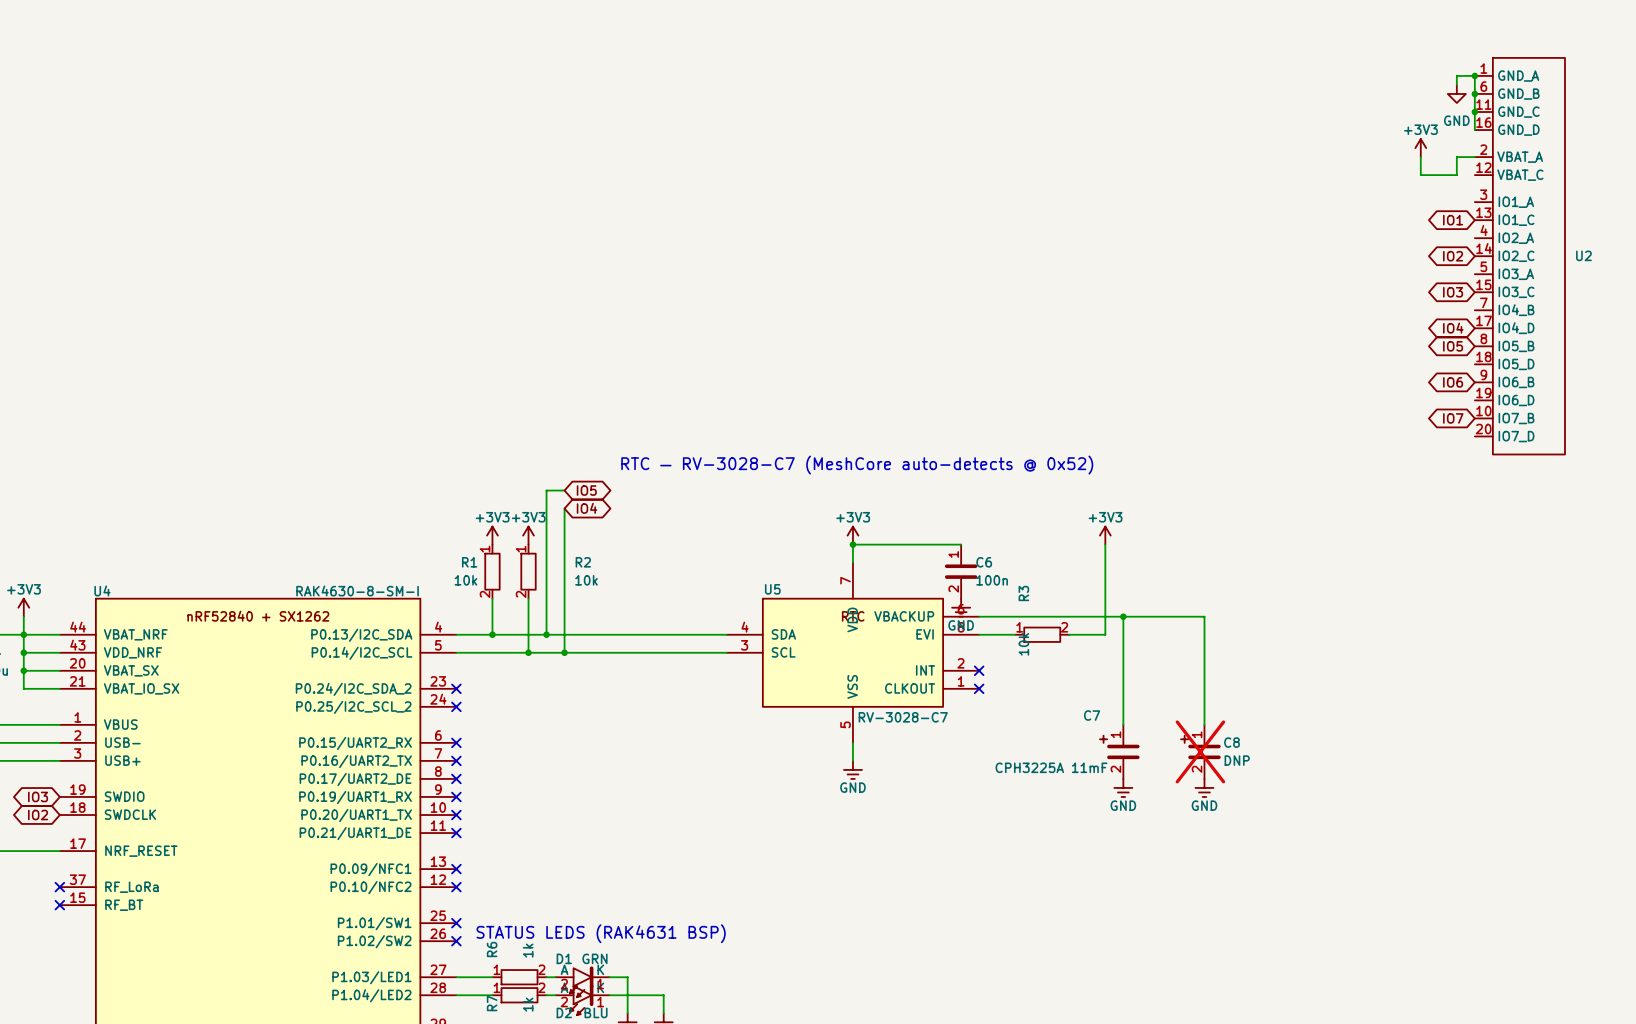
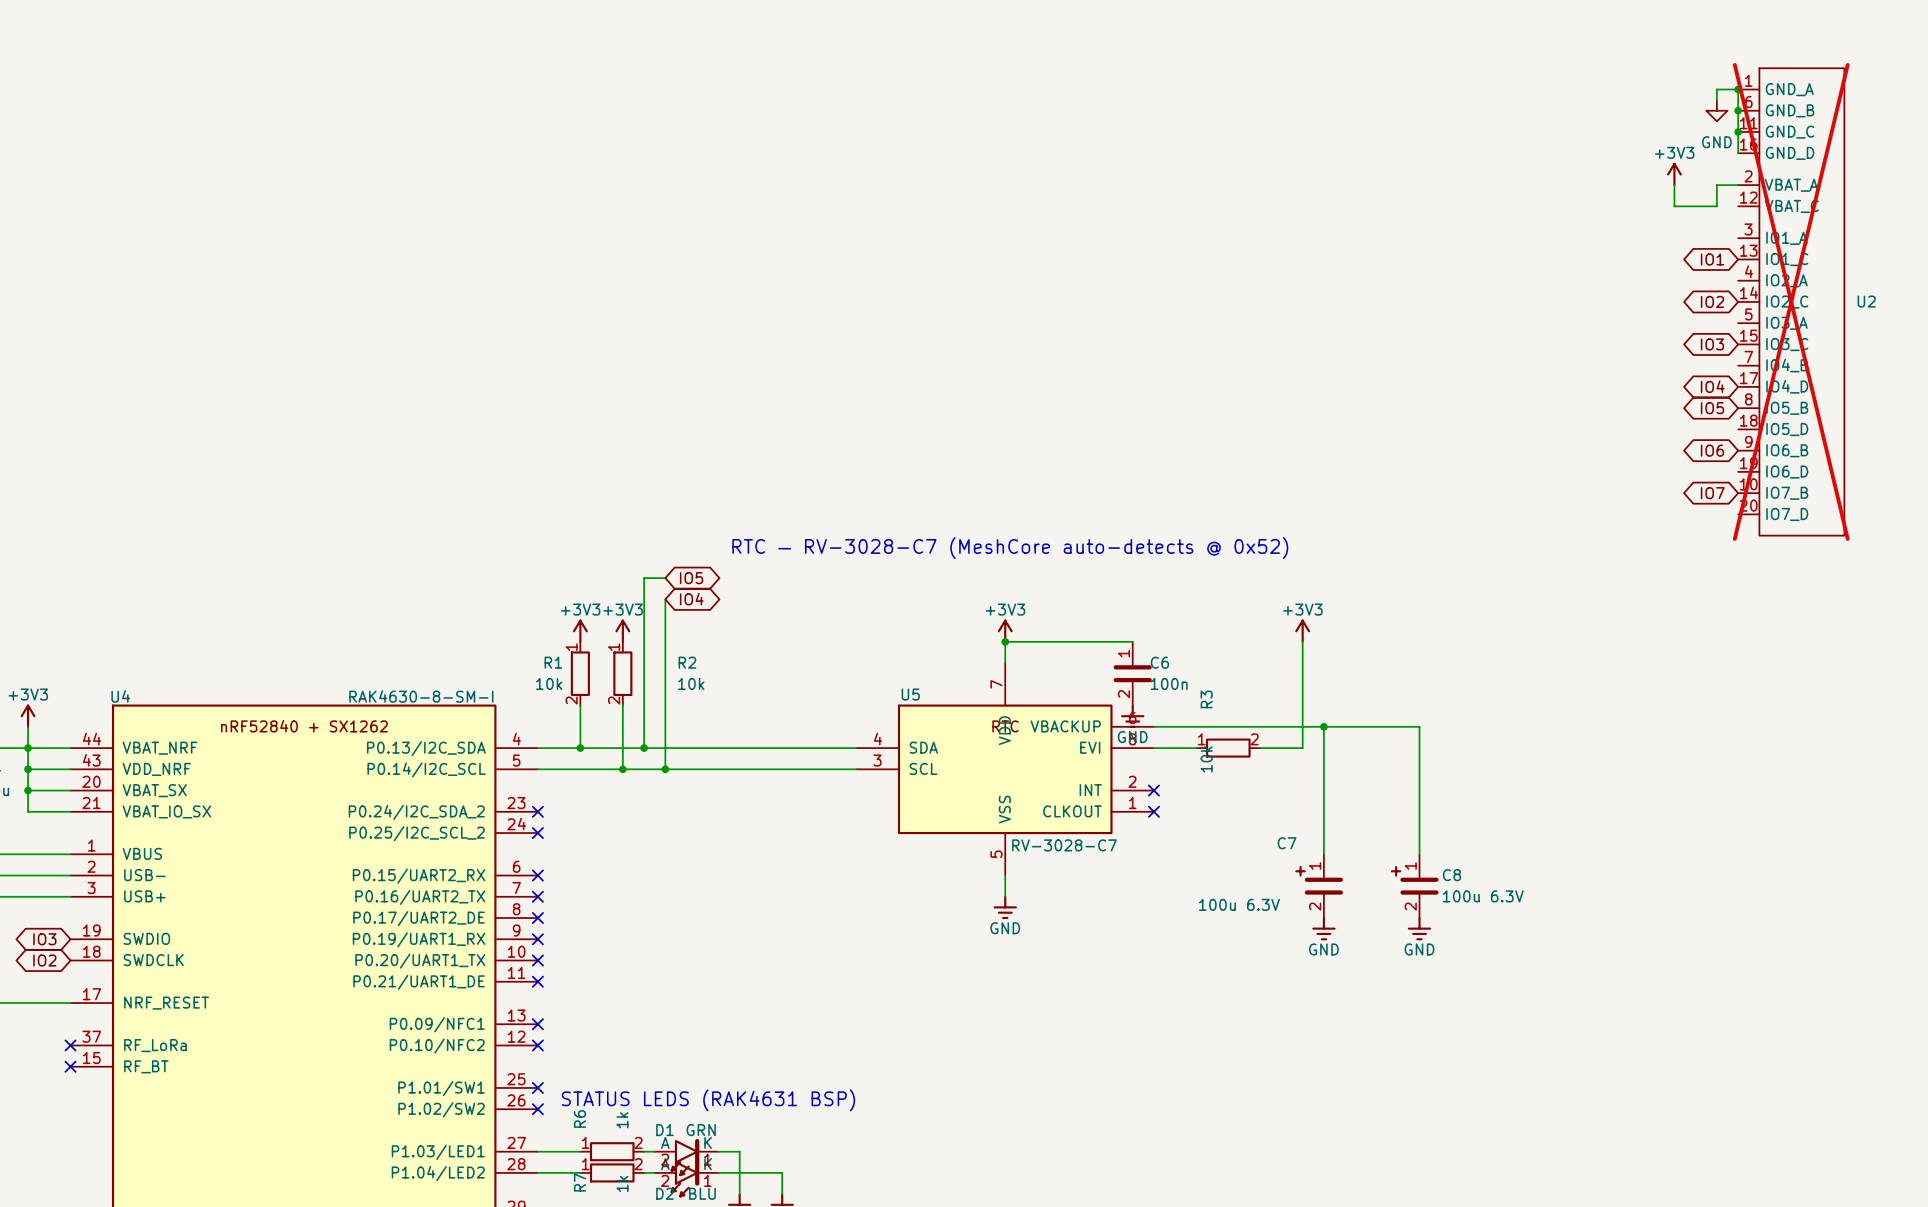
U2 do-not-place cross: none -> (1791, 301)
C8 do-not-place cross: (1200, 751) -> none
C8 value: DNP (1237, 760) -> 100u 6.3V (1483, 896)
C7 value: CPH3225A 11mF (1051, 767) -> 100u 6.3V (1239, 904)

